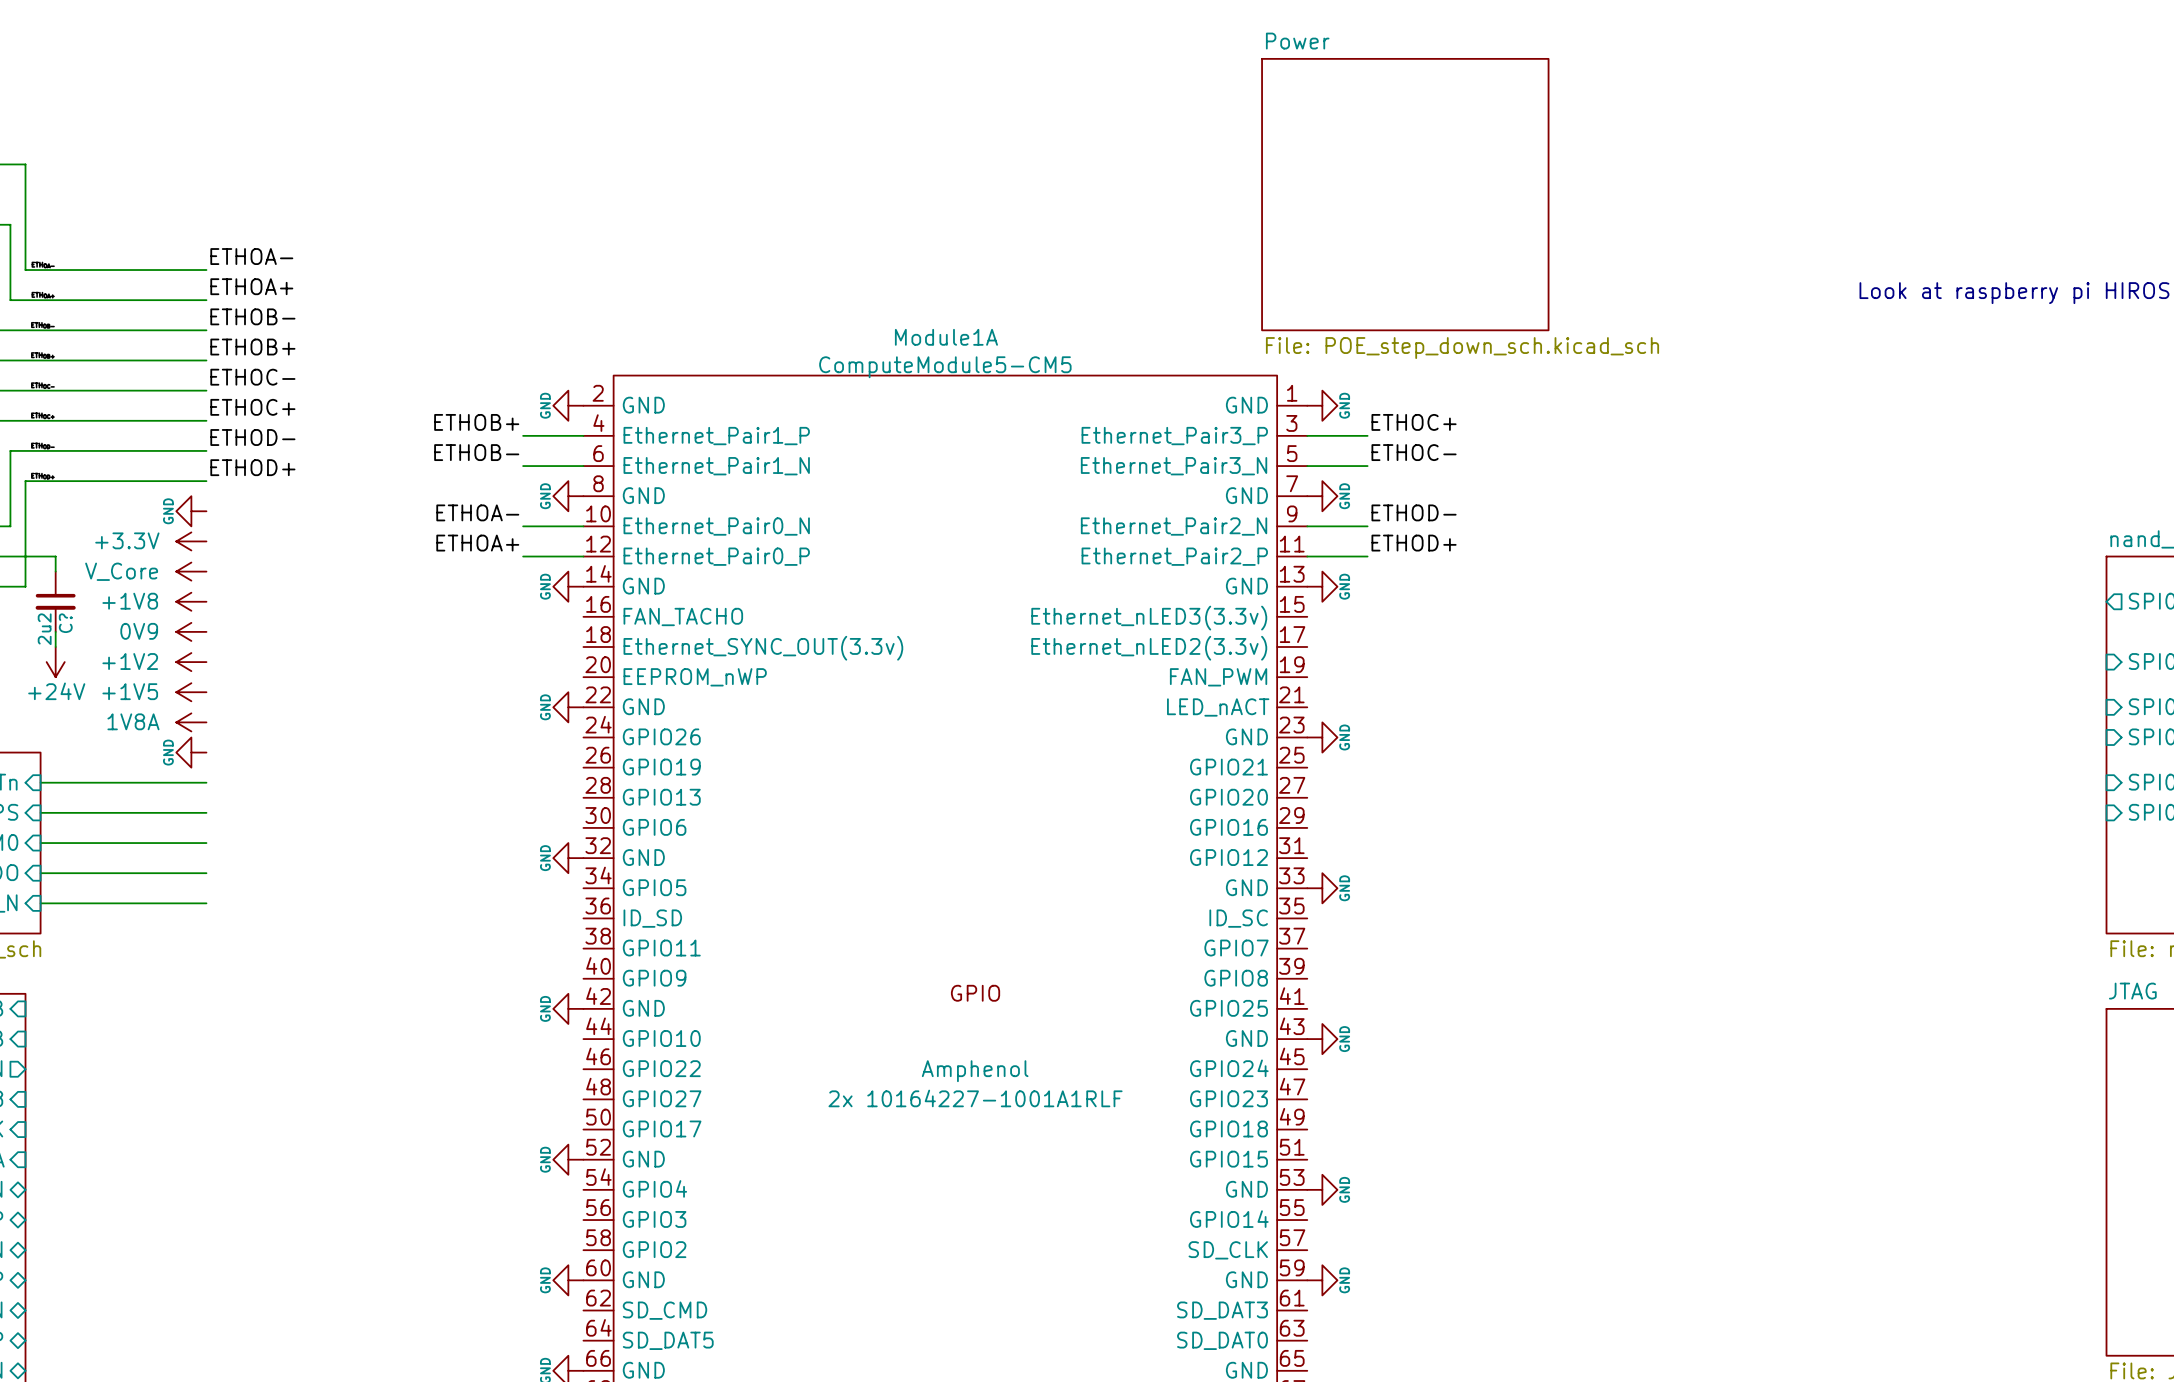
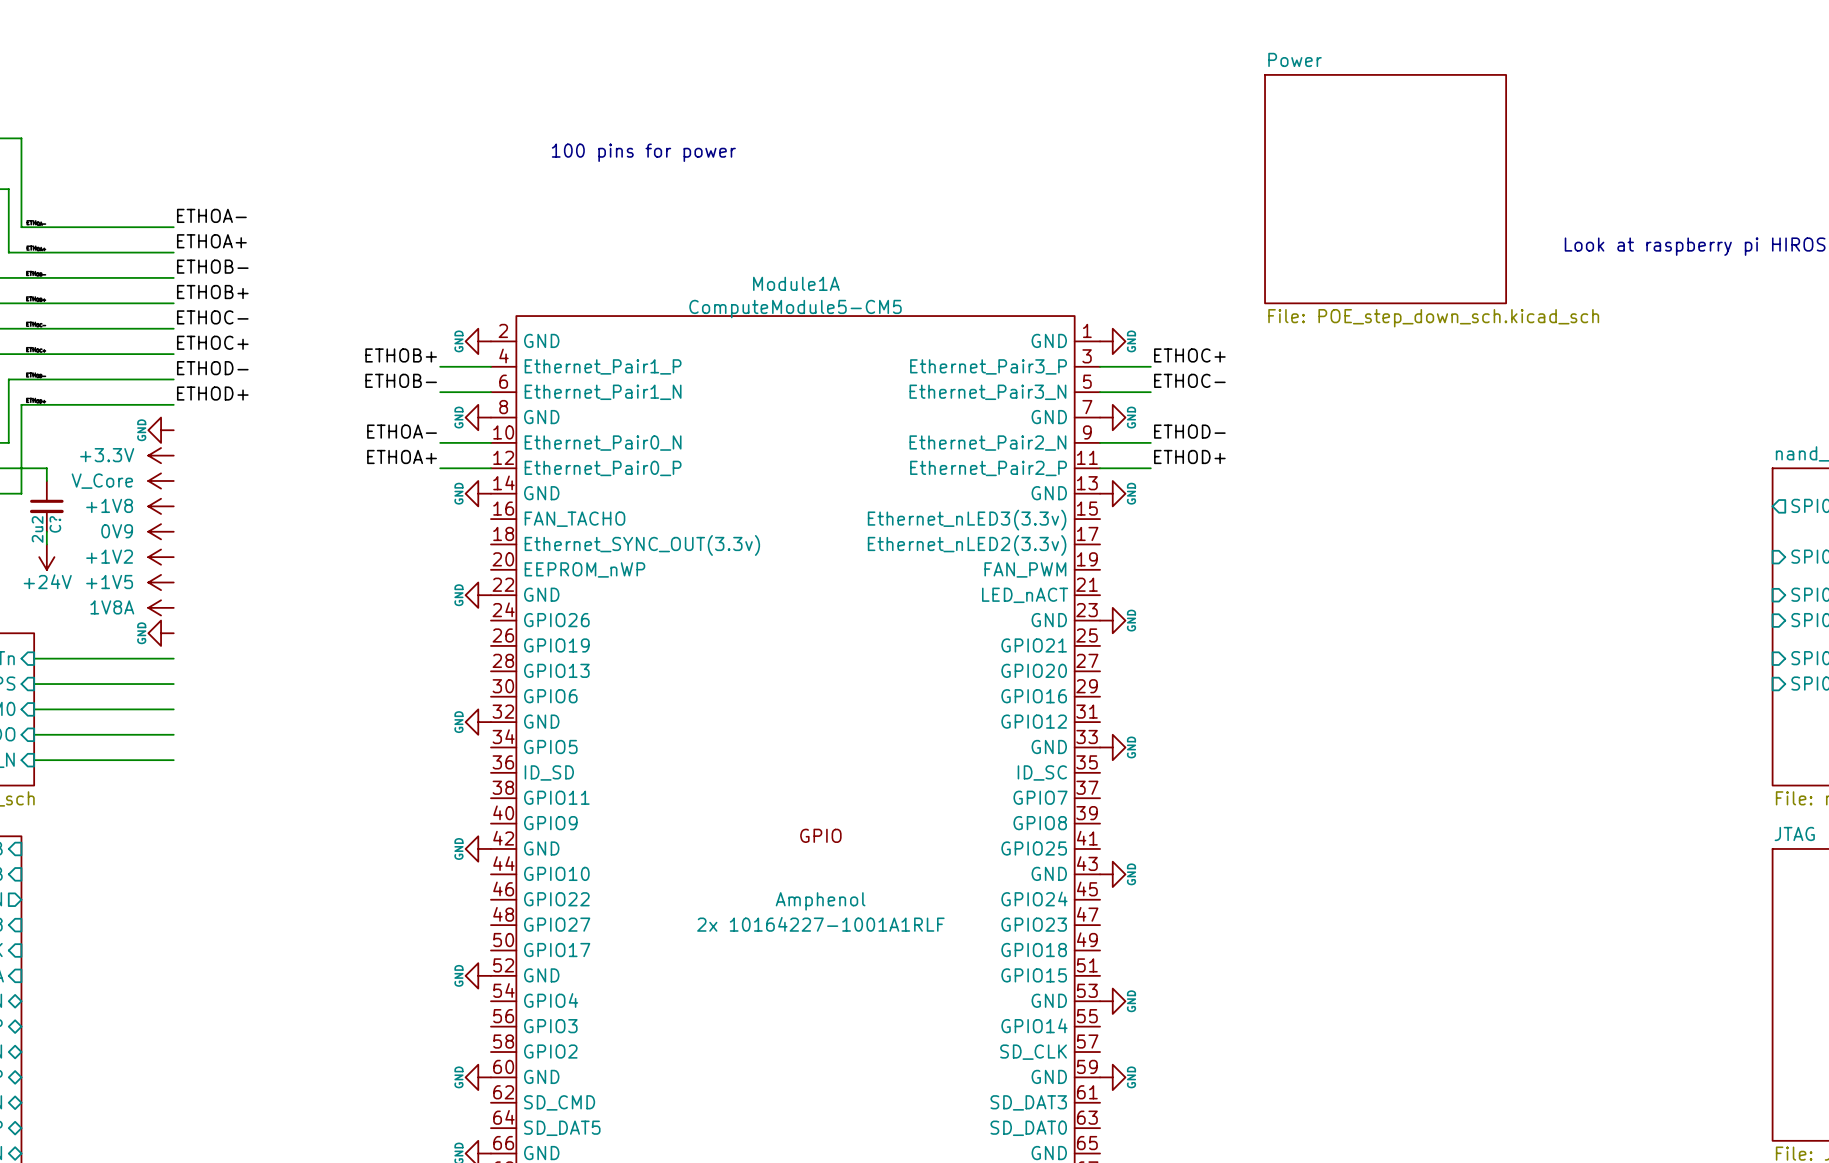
text: none -> 100 pins for power (643, 152)
sheet Power position: (1405, 194) -> (1385, 189)

